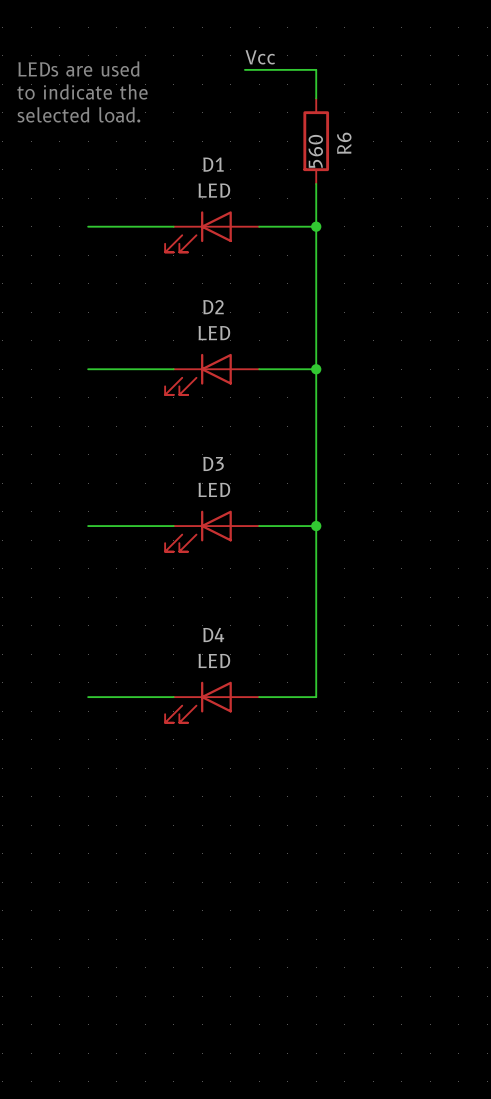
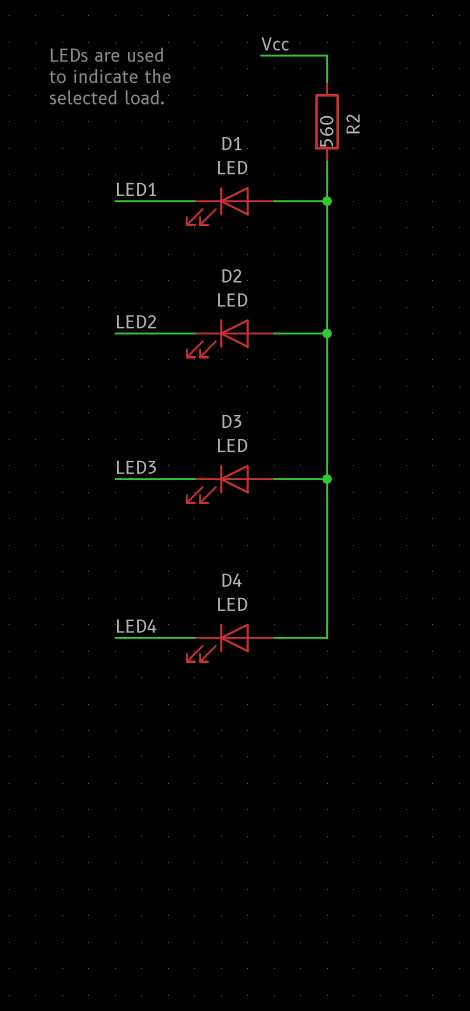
R6 name: R6 (344, 143) -> R2 (353, 124)
label: none -> LED1 (136, 189)
label: none -> LED2 (136, 321)
label: none -> LED3 (136, 467)
label: none -> LED4 (136, 626)

